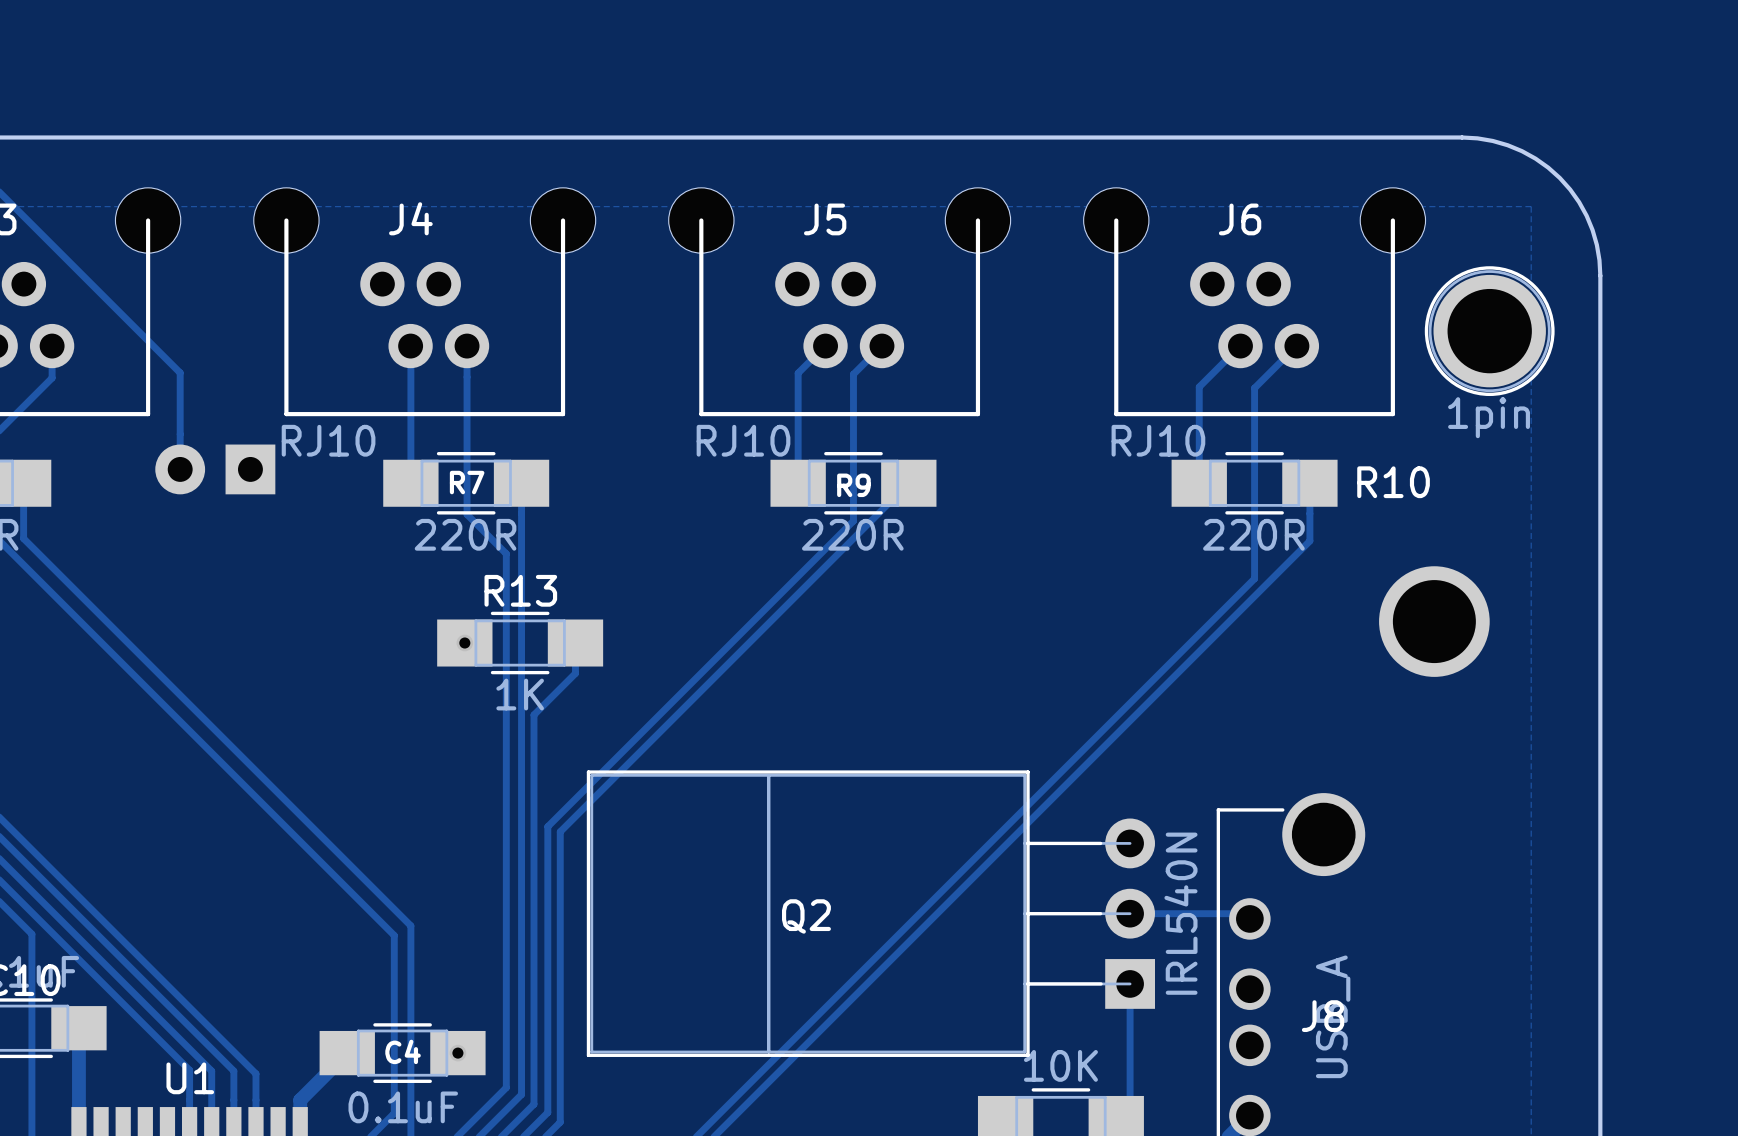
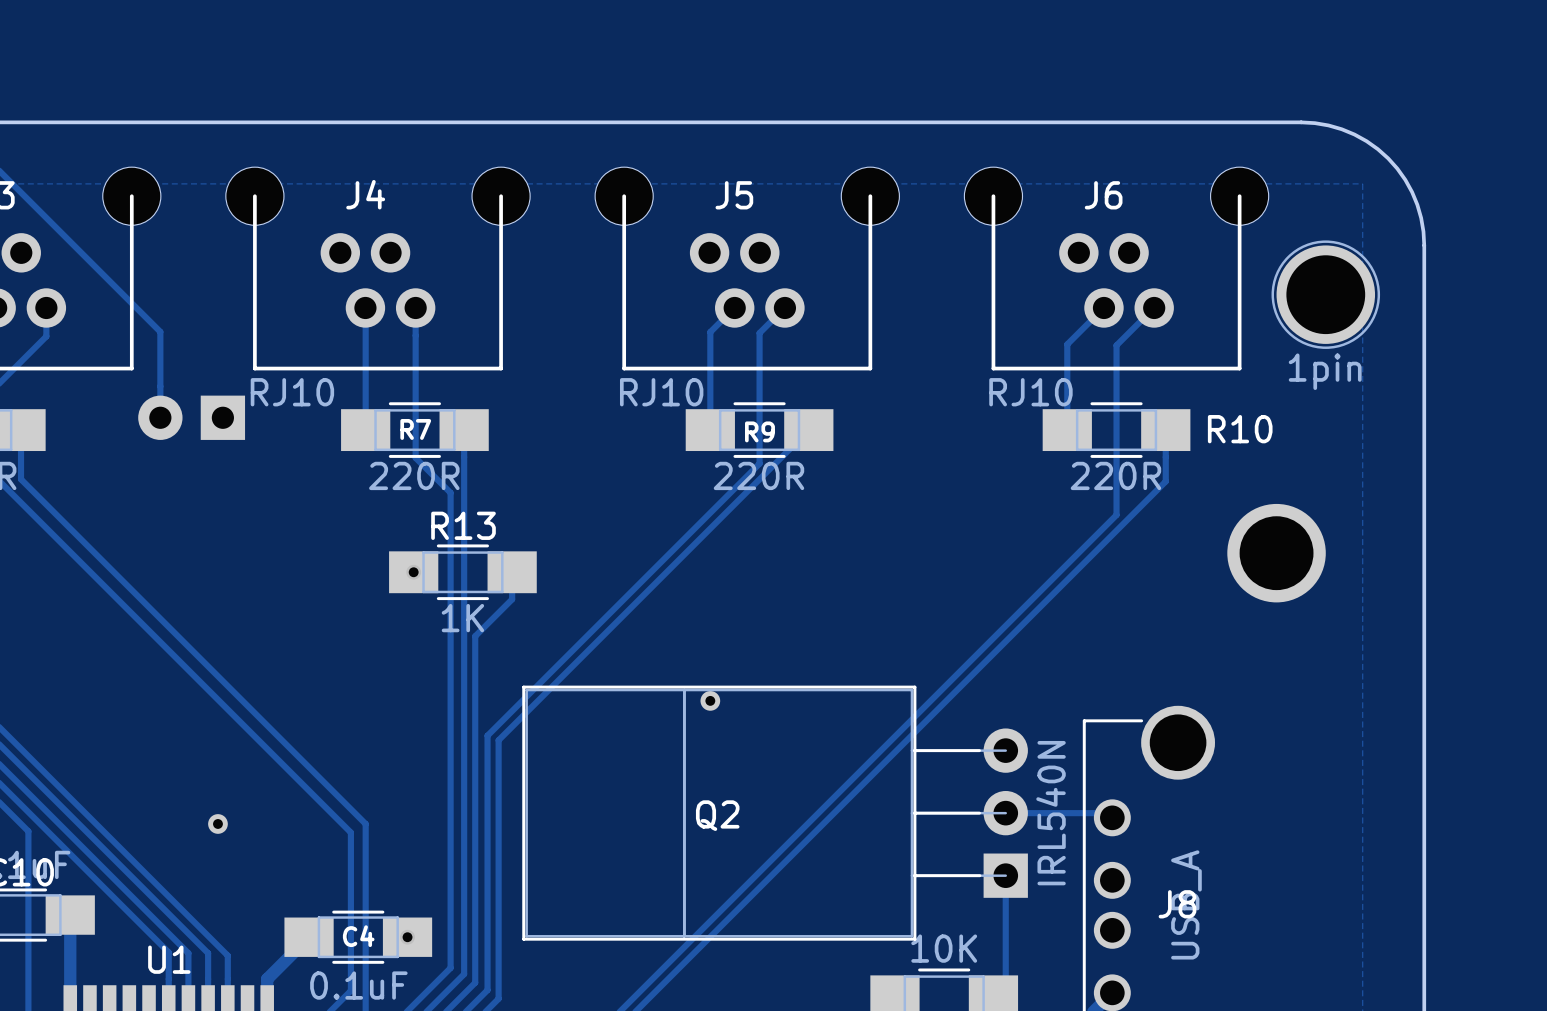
part footprint: [1424, 266, 1555, 397] -> [1271, 240, 1381, 349]
part: none -> (710, 700)
part: none -> (217, 823)

